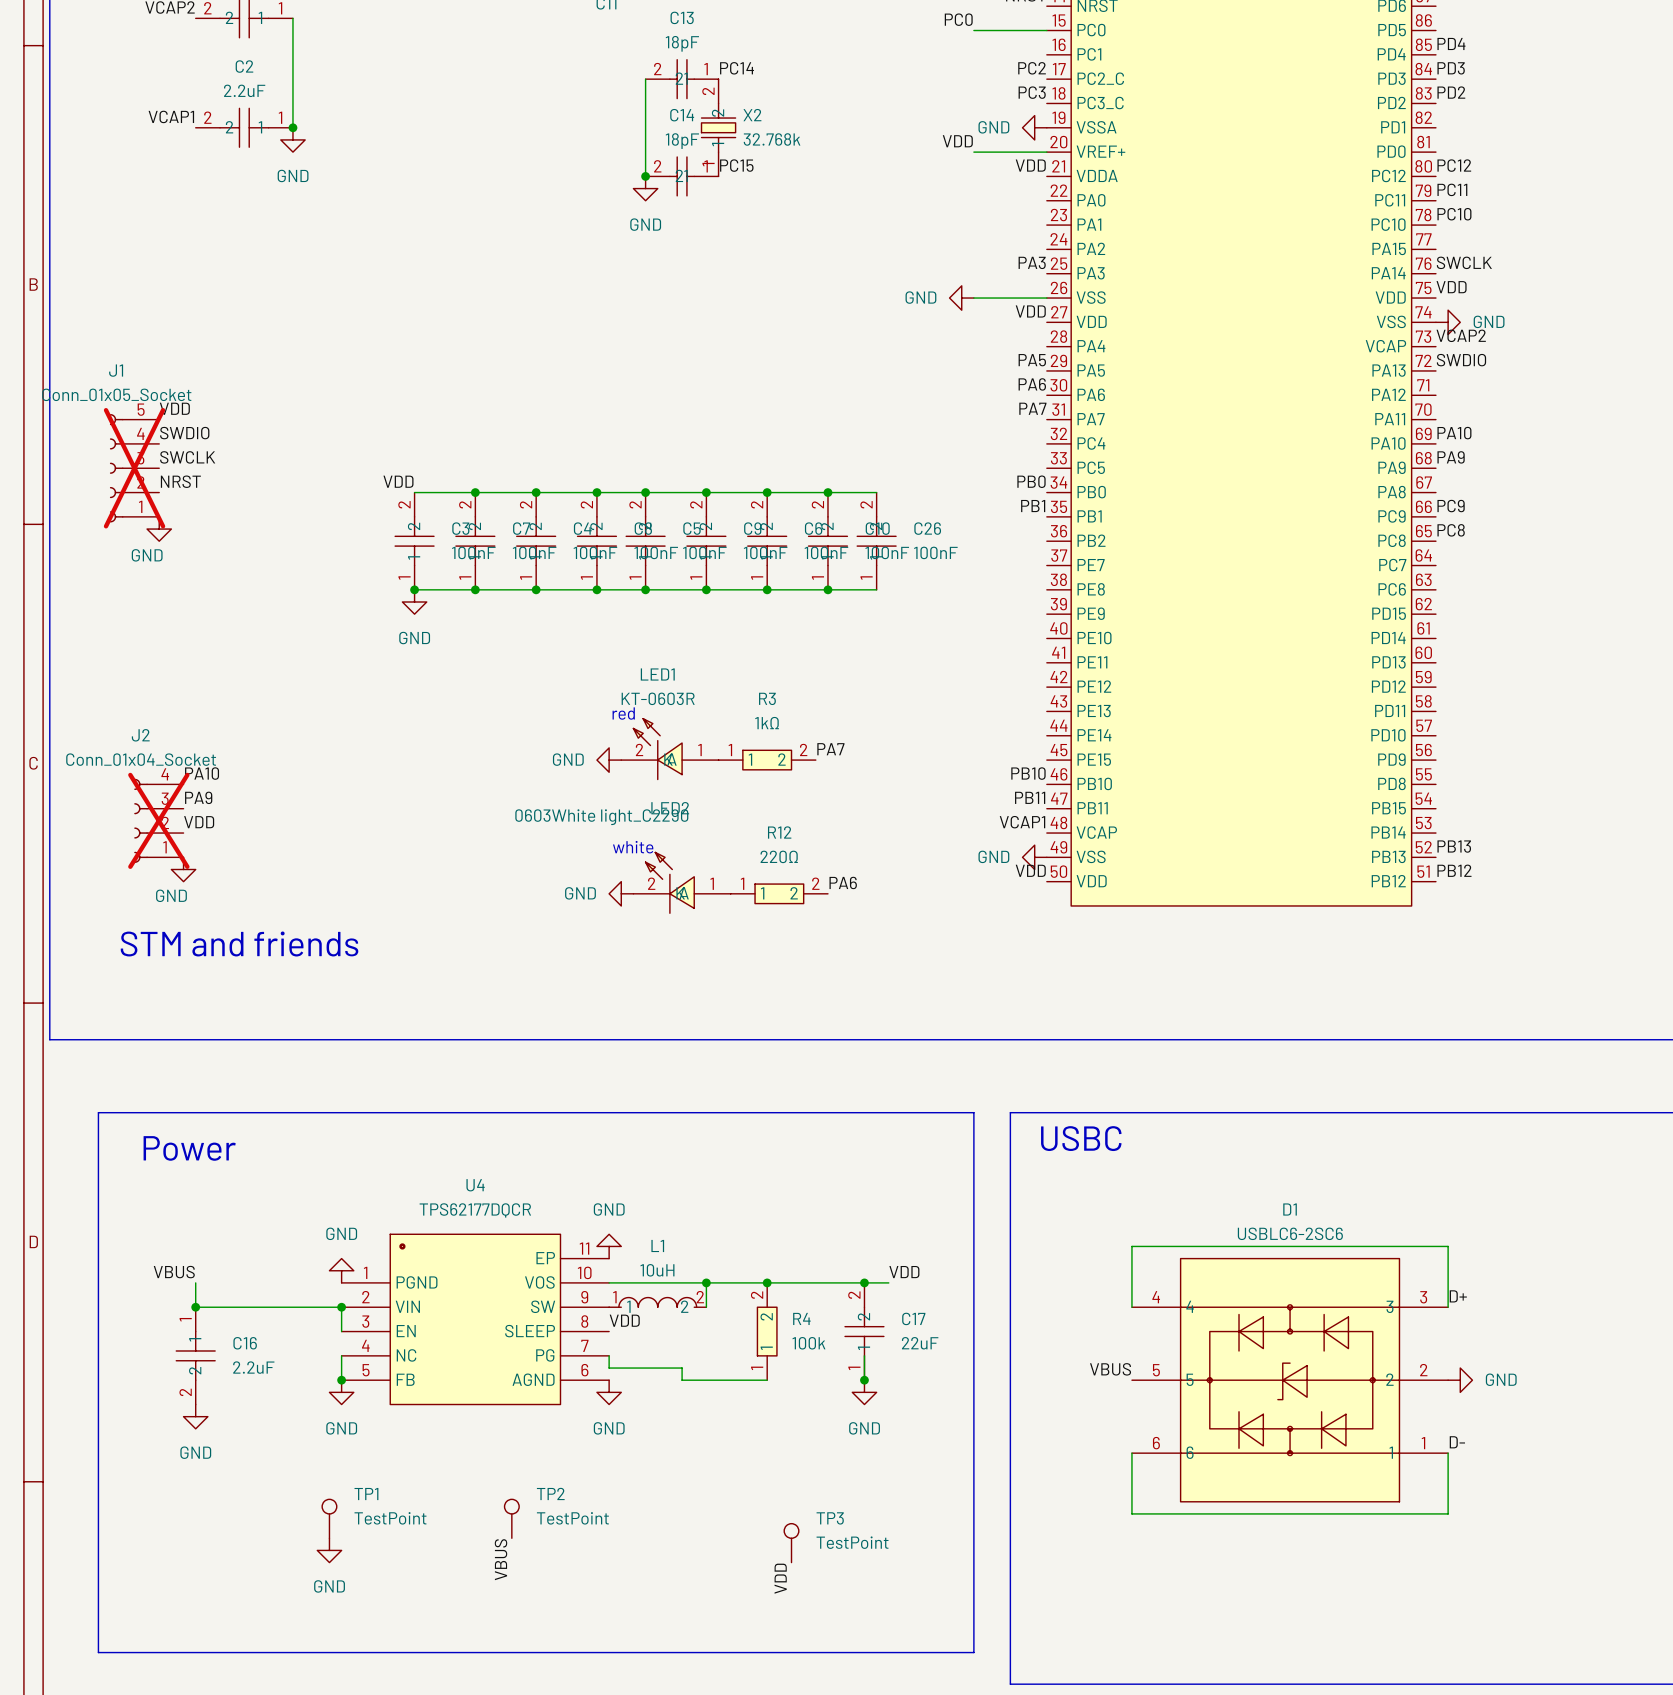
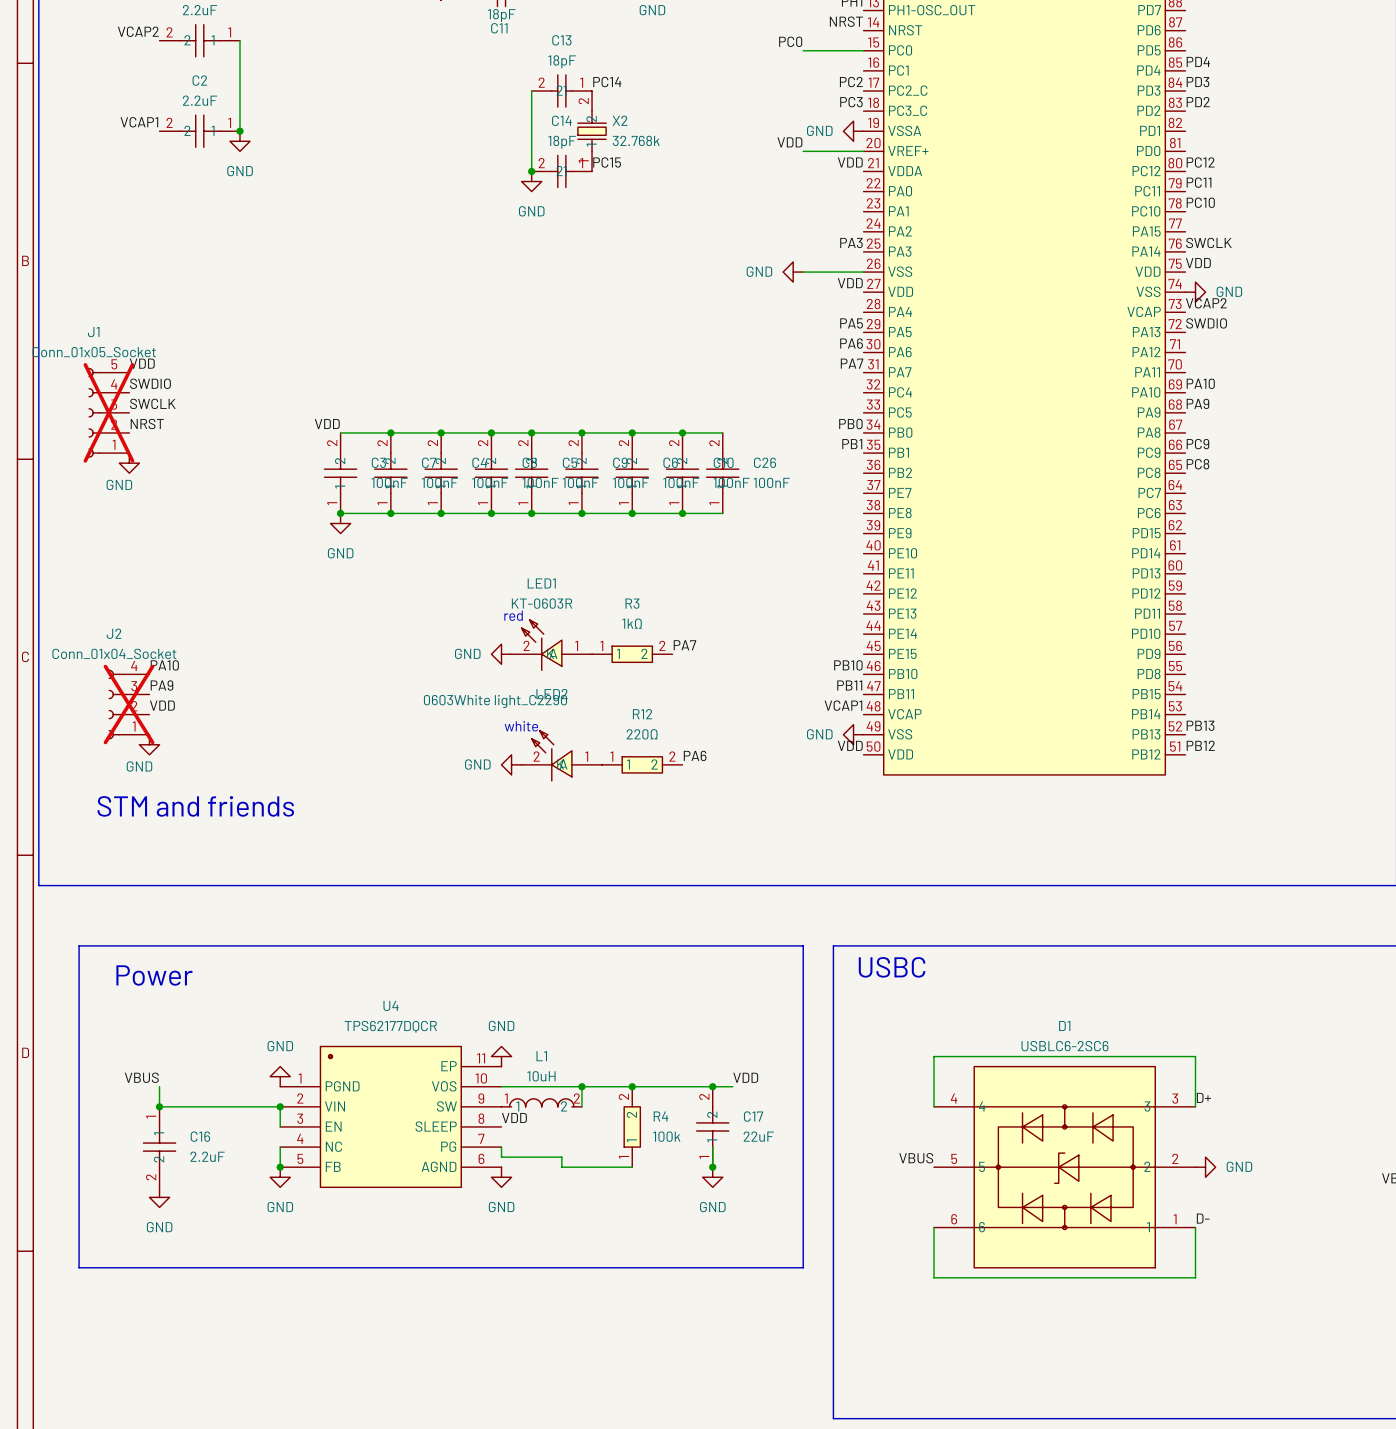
line: (98, 1501) (98, 1652) (973, 1652) (973, 1501) -> (79, 1267) (803, 1267)
TP1: TestPoint (329, 1518) -> none
TP2: TestPoint (511, 1518) -> none
TP3: TestPoint (791, 1543) -> none
power symbol: GND (329, 1550) -> none
label: VBUS (500, 1559) -> none
label: VDD (780, 1578) -> none

